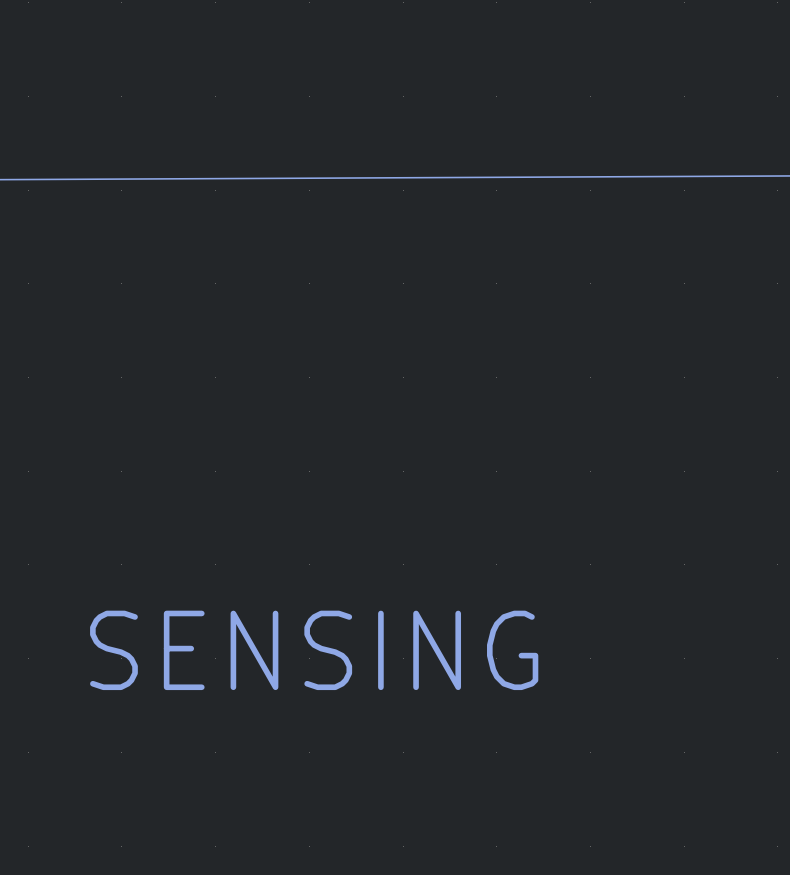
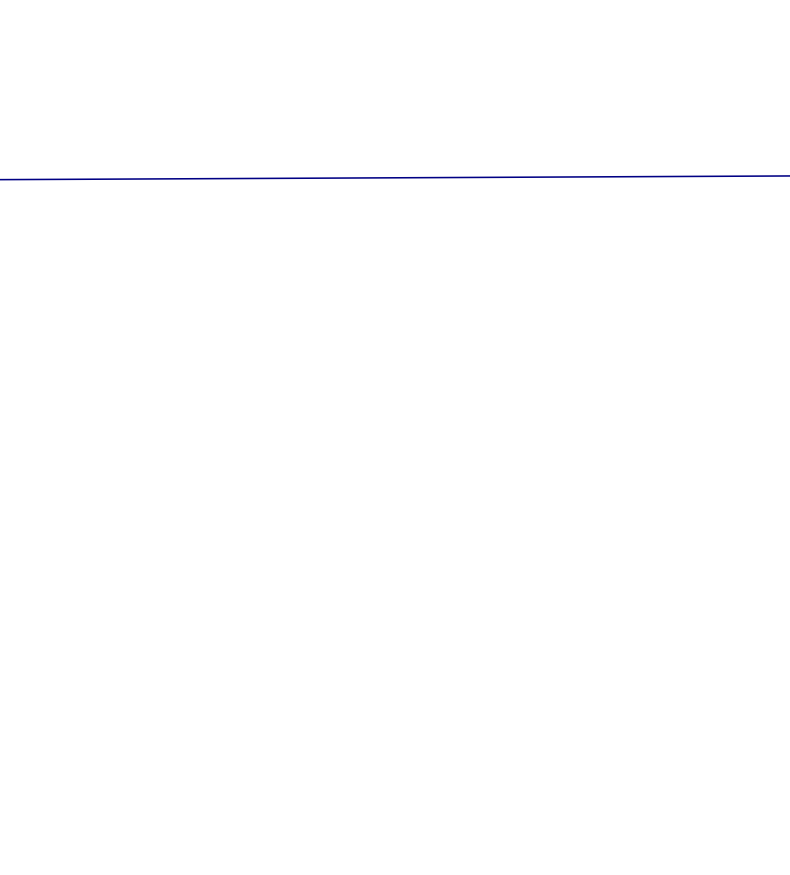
text: SENSING (314, 650) -> none

